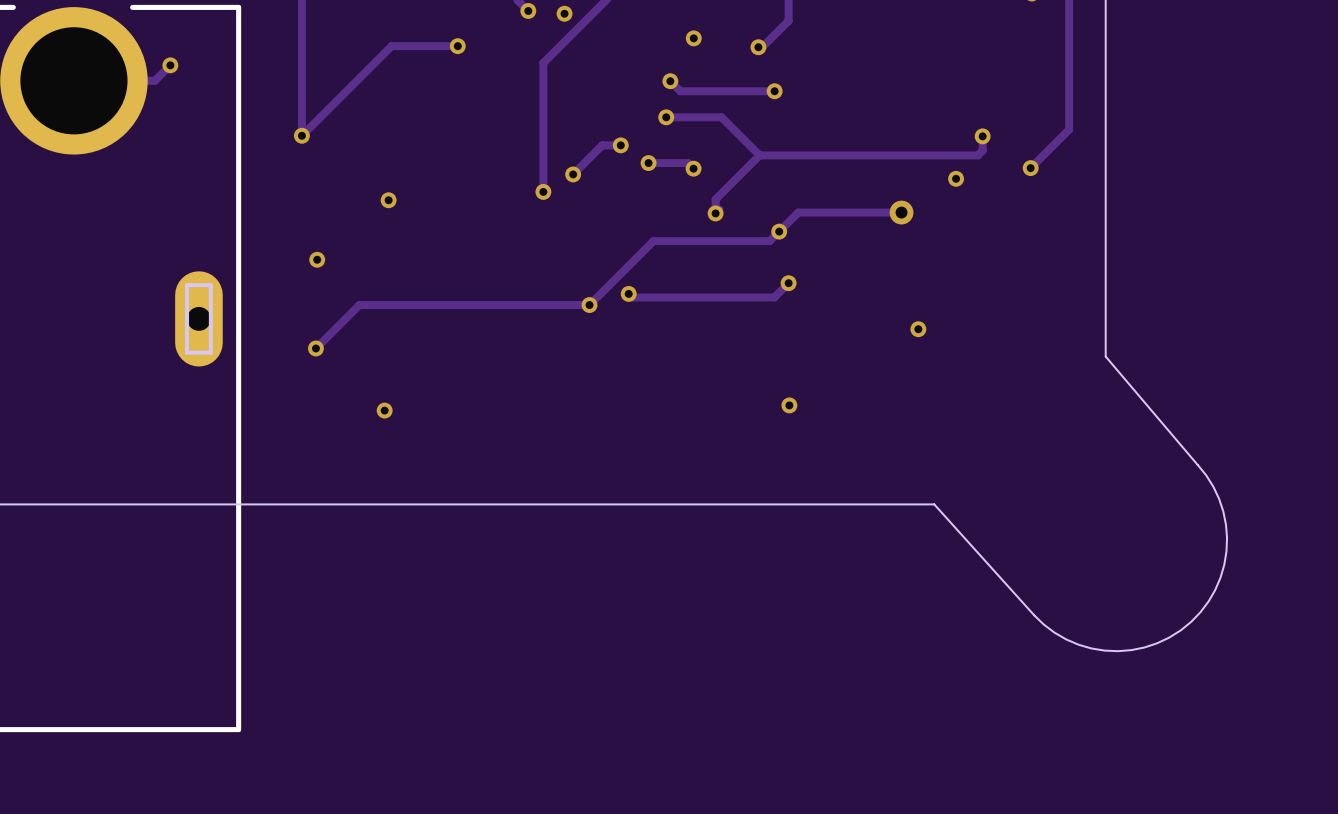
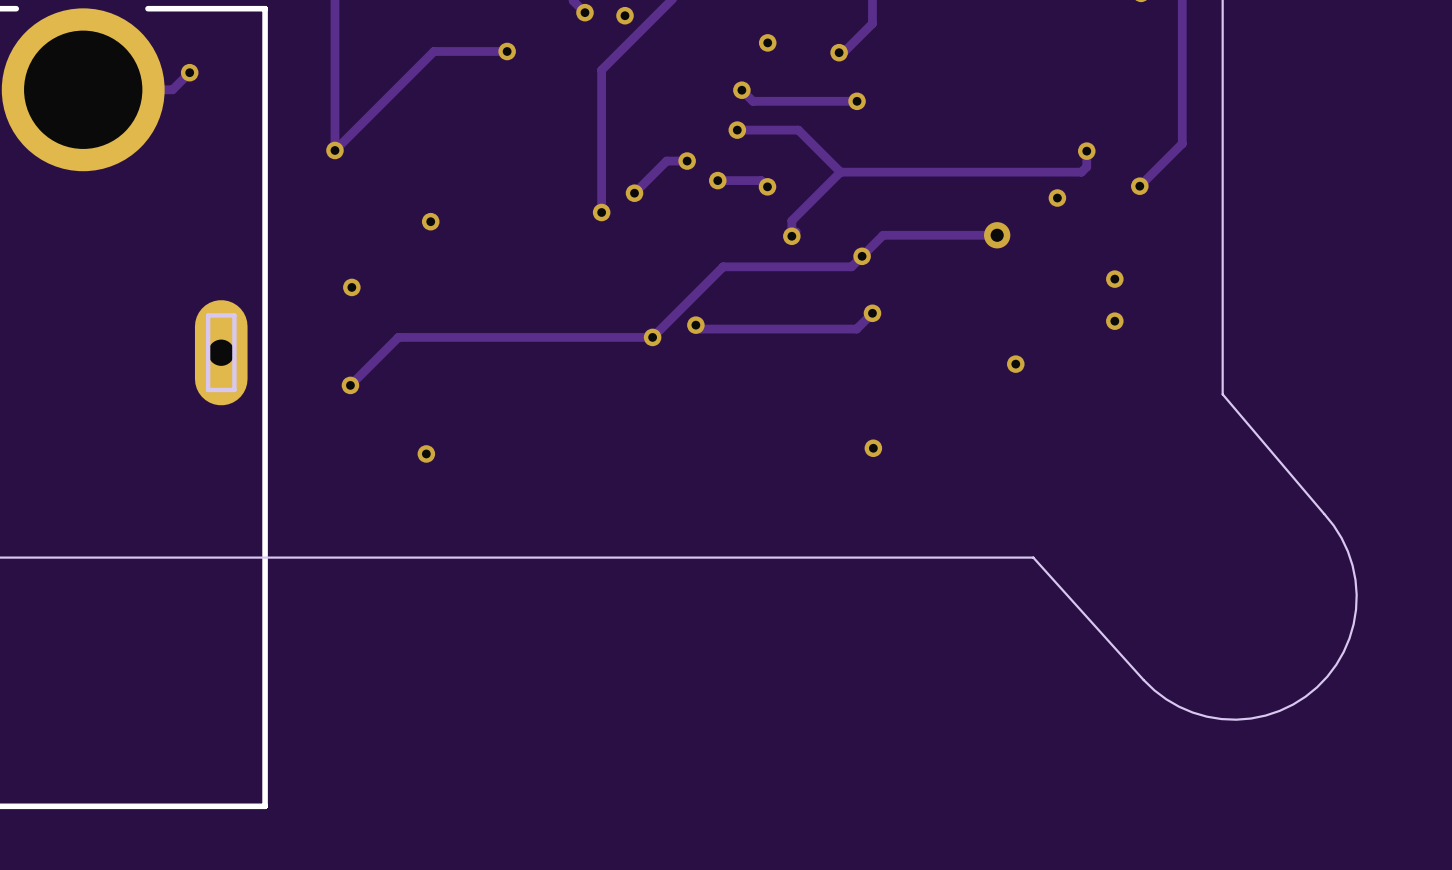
via: none -> (1114, 279)
via: none -> (1114, 321)

